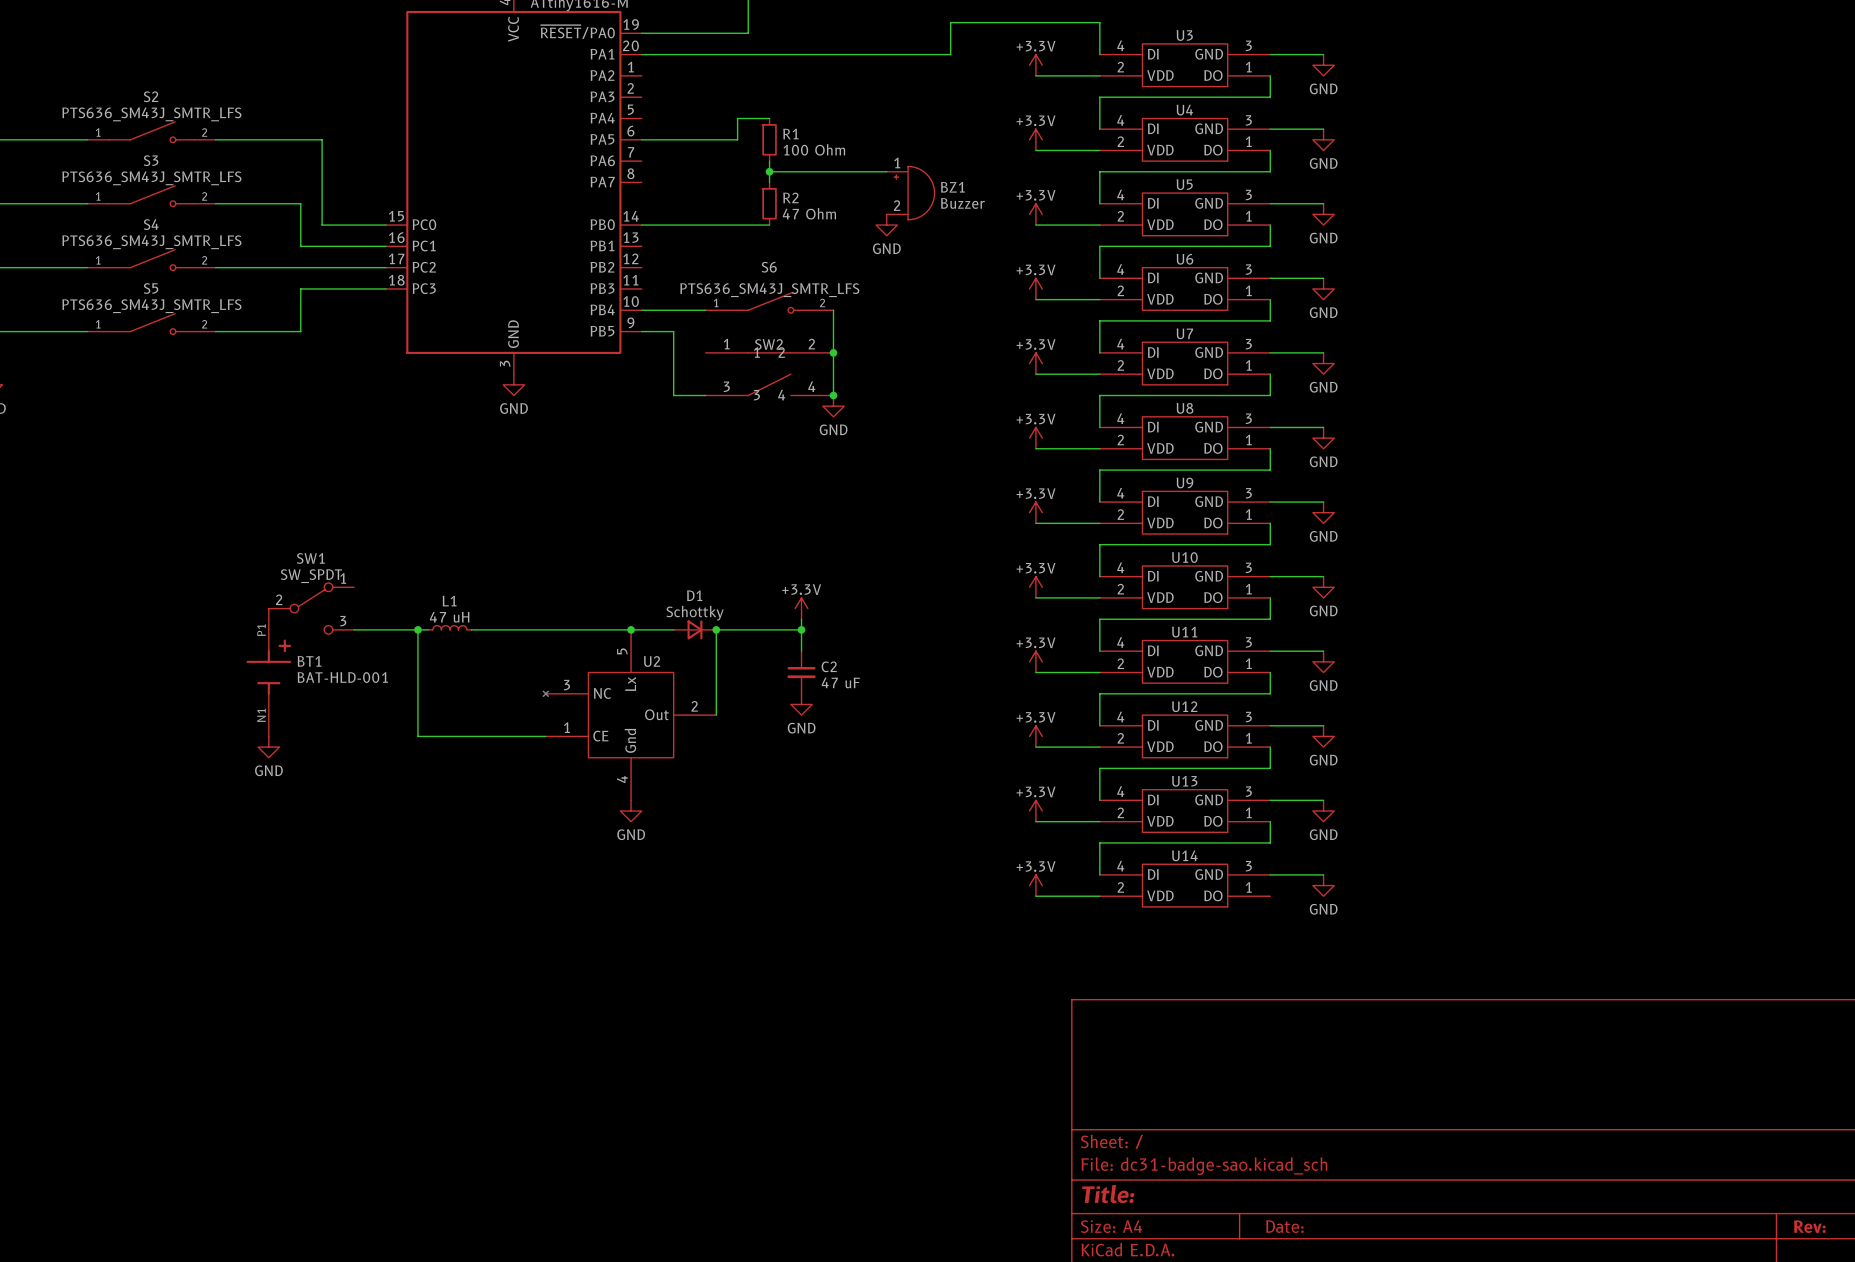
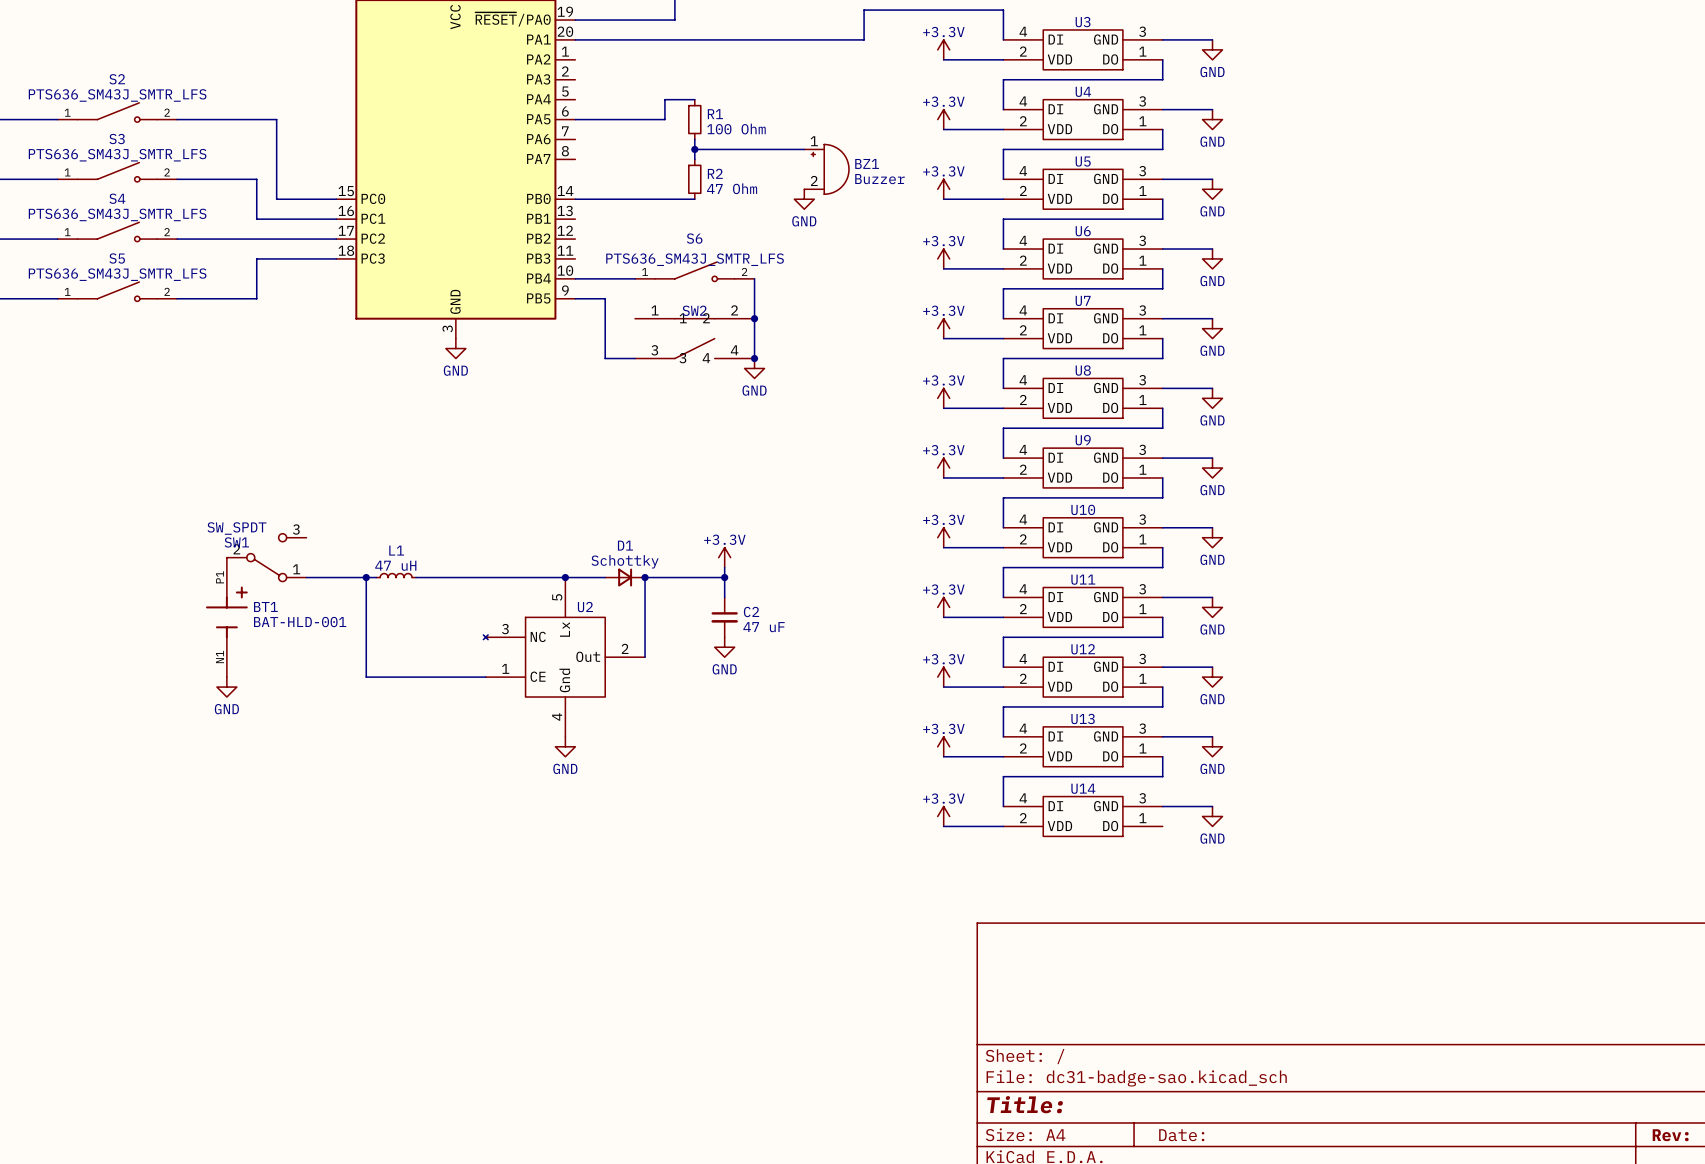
SW1 name position: SW1 (310, 558) -> SW1 (236, 542)
SW1 value position: SW_SPDT (311, 576) -> SW_SPDT (236, 528)
SW1 flip: as is (311, 608) -> up-down (266, 557)

